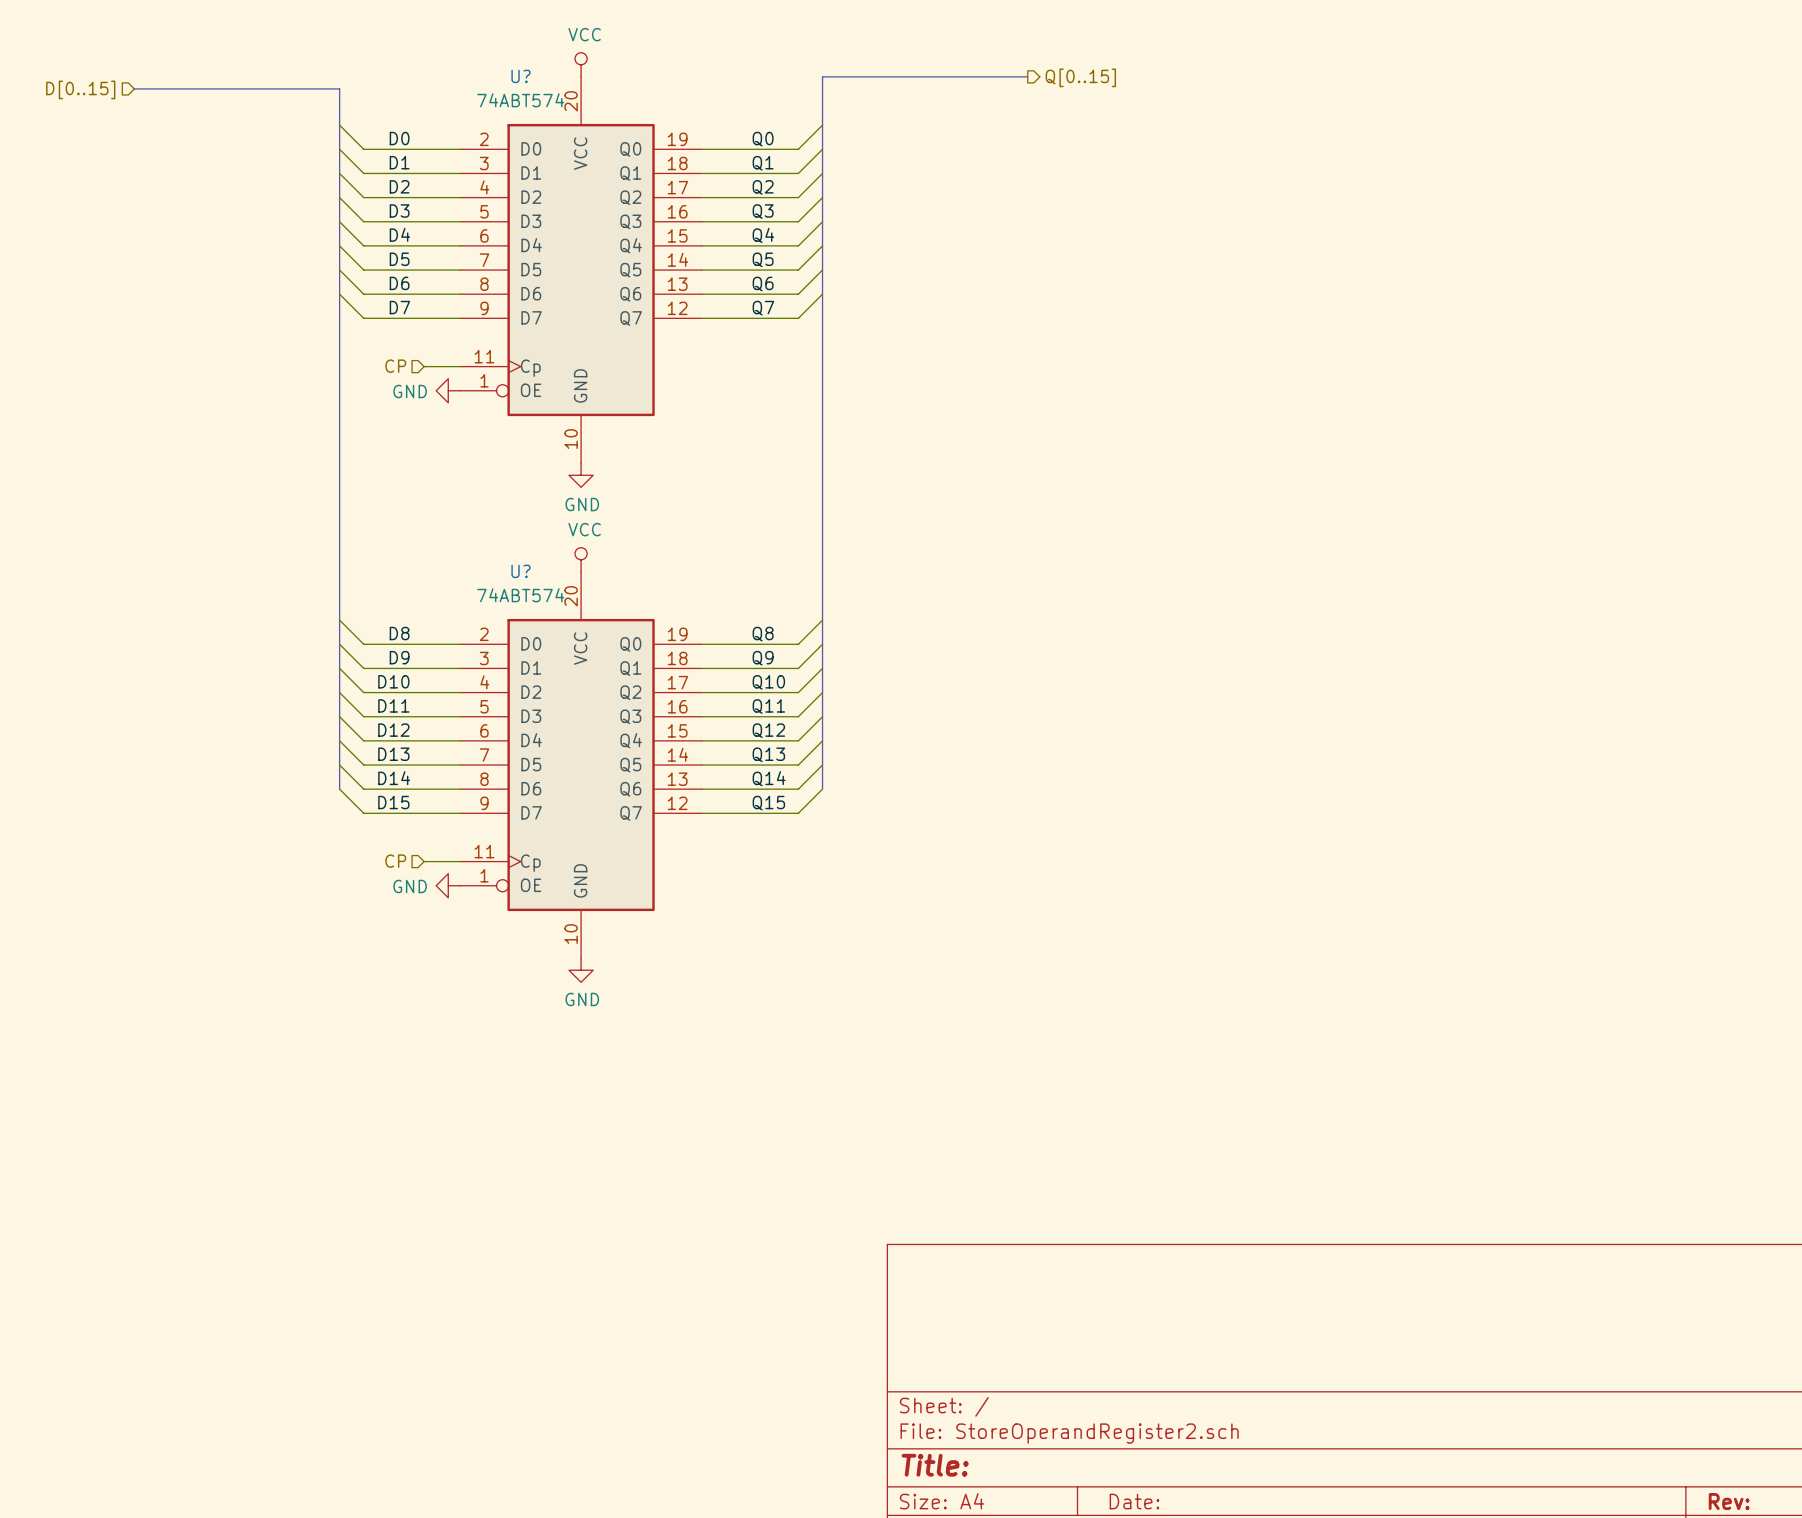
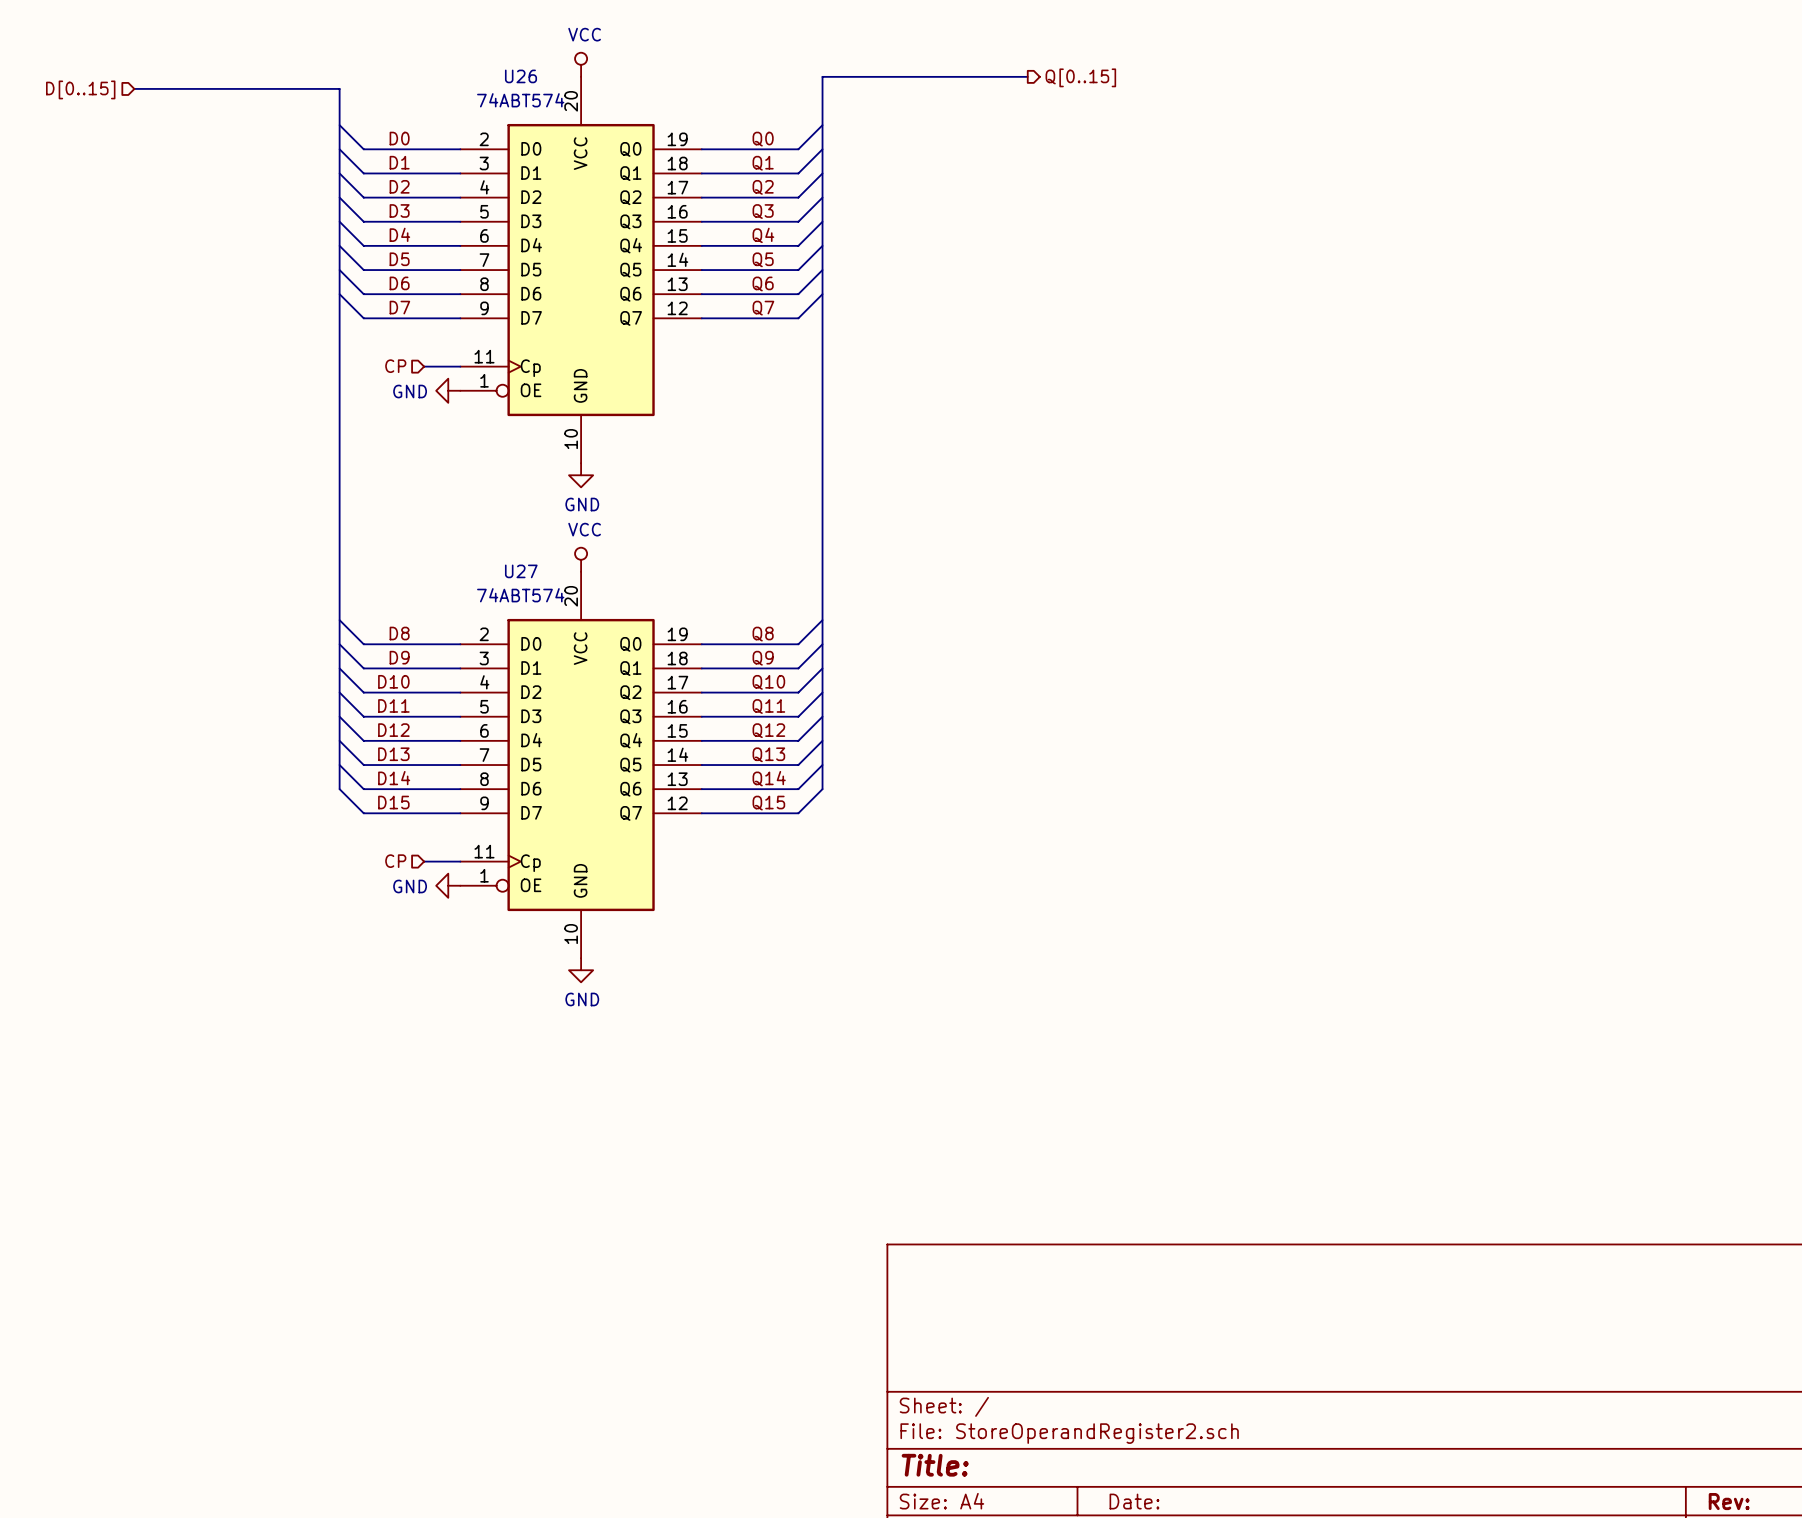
U? name: U? (521, 76) -> U26 (521, 76)
U? name: U? (521, 571) -> U27 (521, 571)

